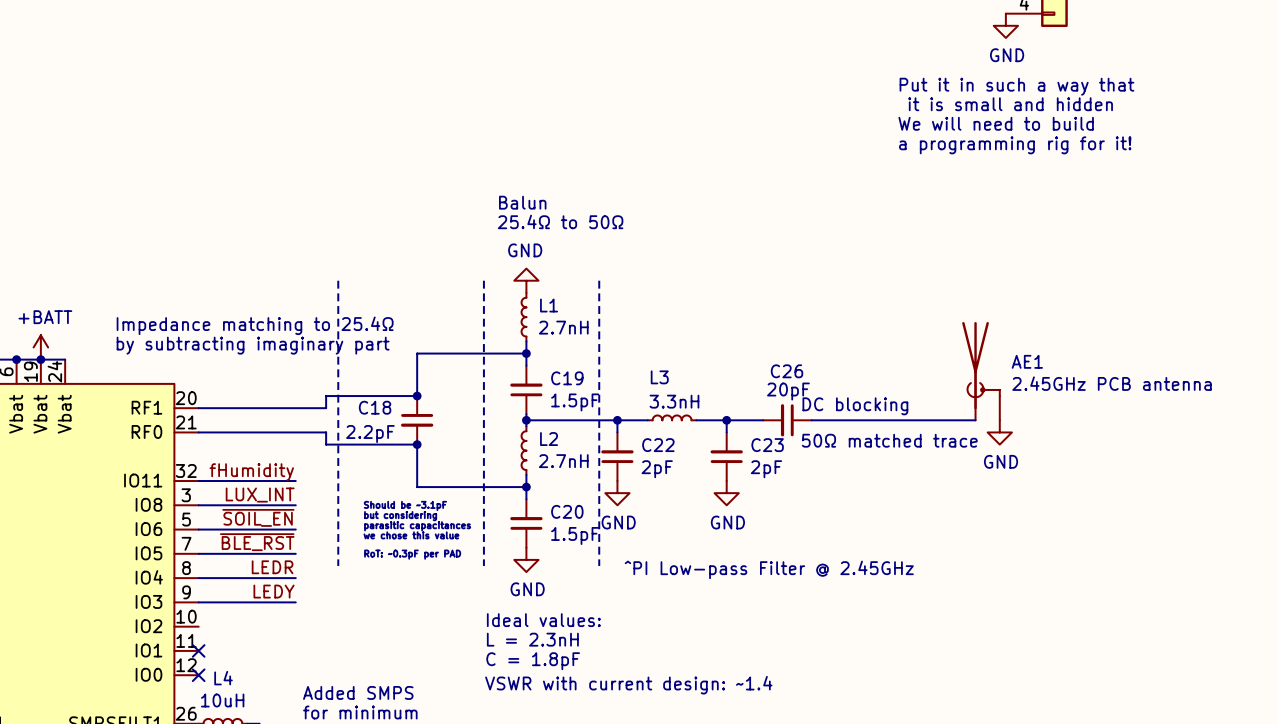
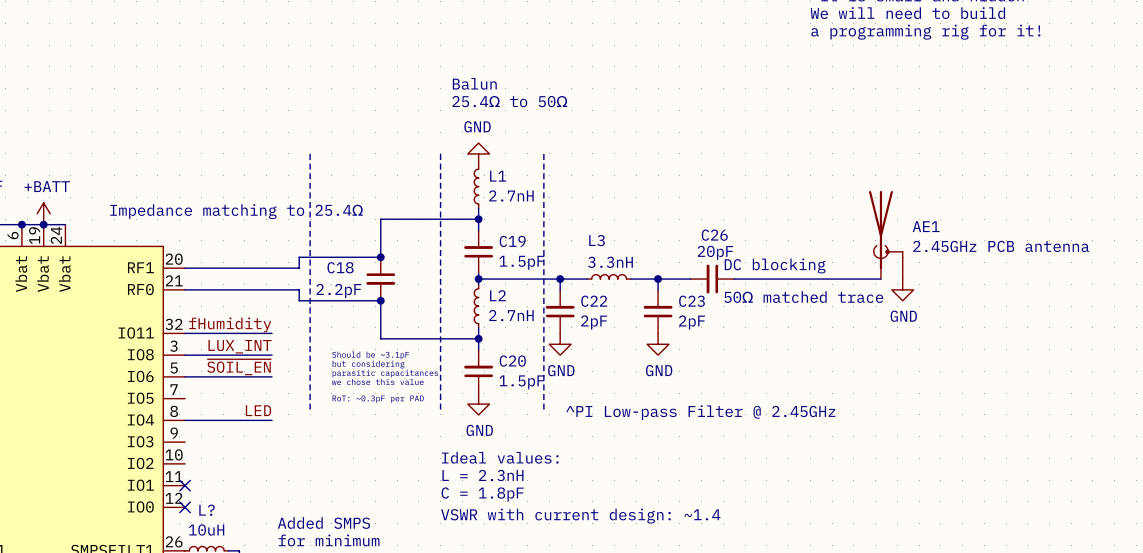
text: Impedance matching to 25.4Ω (255, 325) -> none
text: by subtracting imaginary part (253, 345) -> Impedance matching to 25.4Ω (236, 211)
label: ~{BLE_RST} (257, 542) -> none
wire: (198, 553) (295, 553) -> none
label: LEDR (272, 567) -> LED (258, 410)
label: LEDY (274, 591) -> none
wire: (198, 602) (295, 602) -> none
L4 name: L4 (223, 678) -> L? (207, 510)

